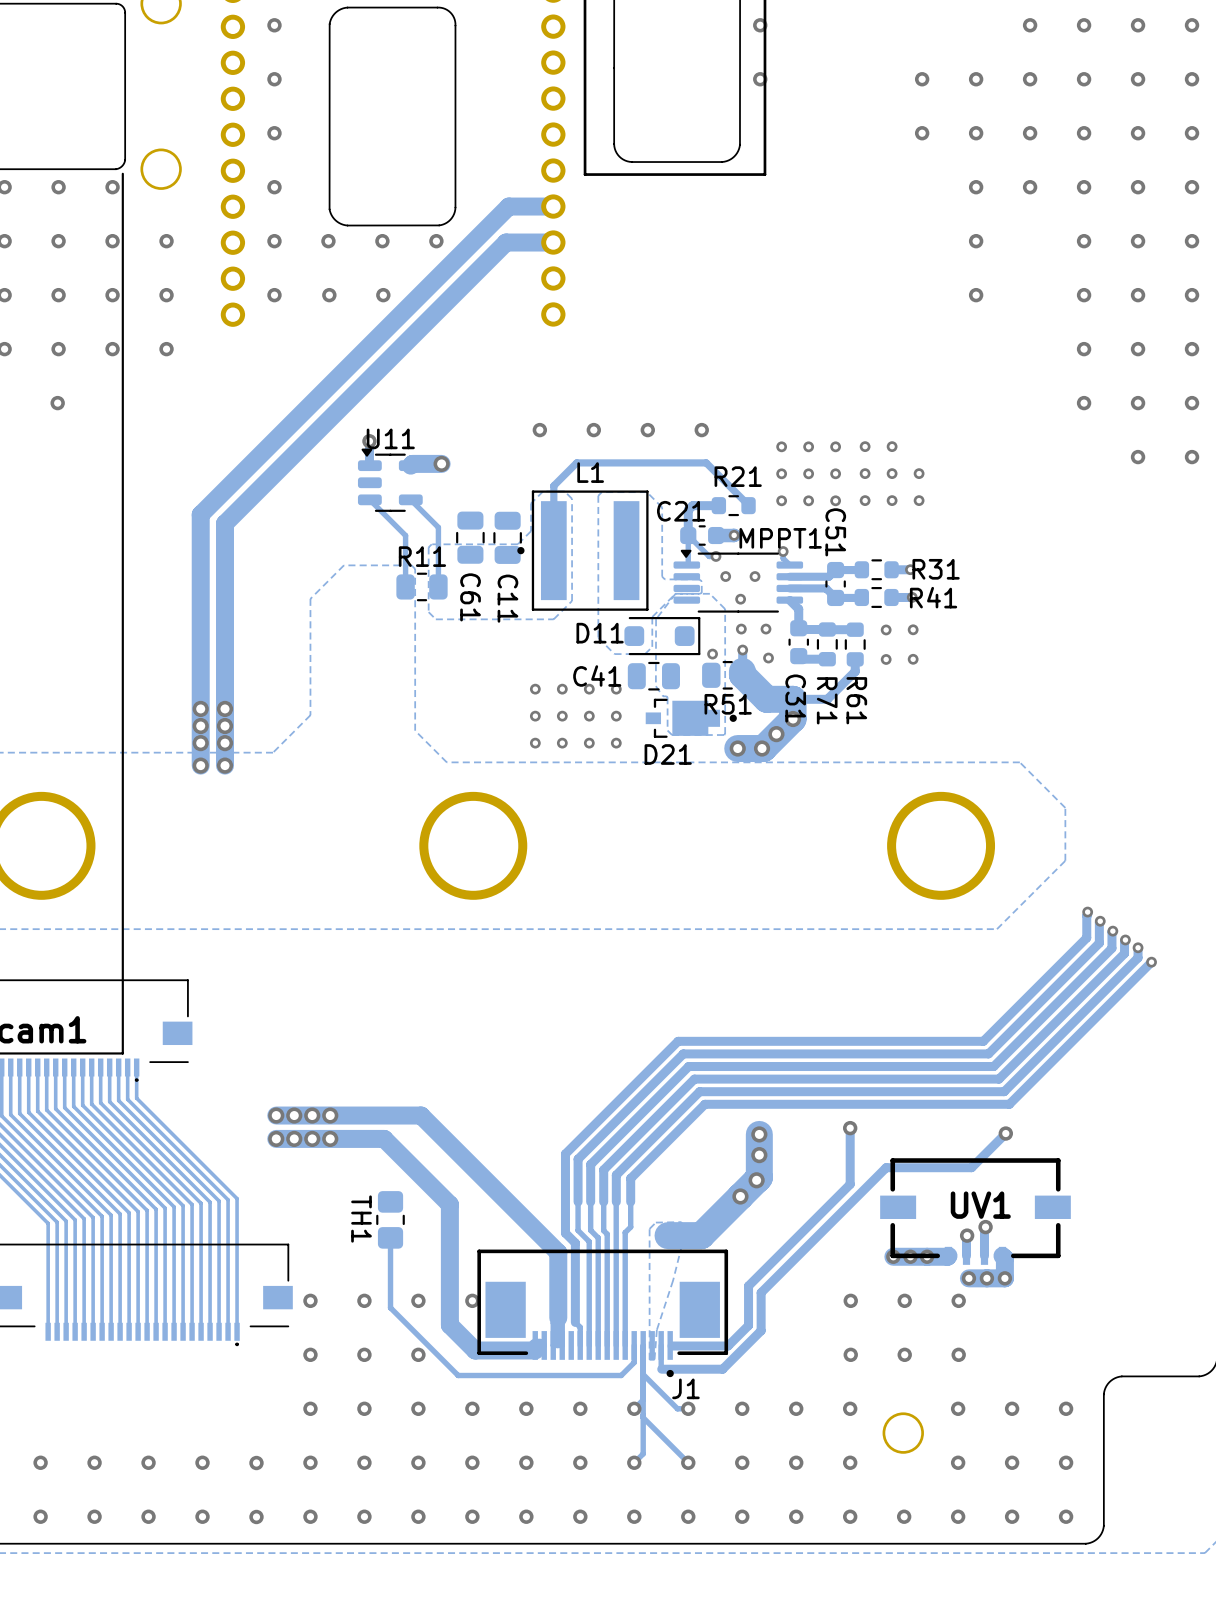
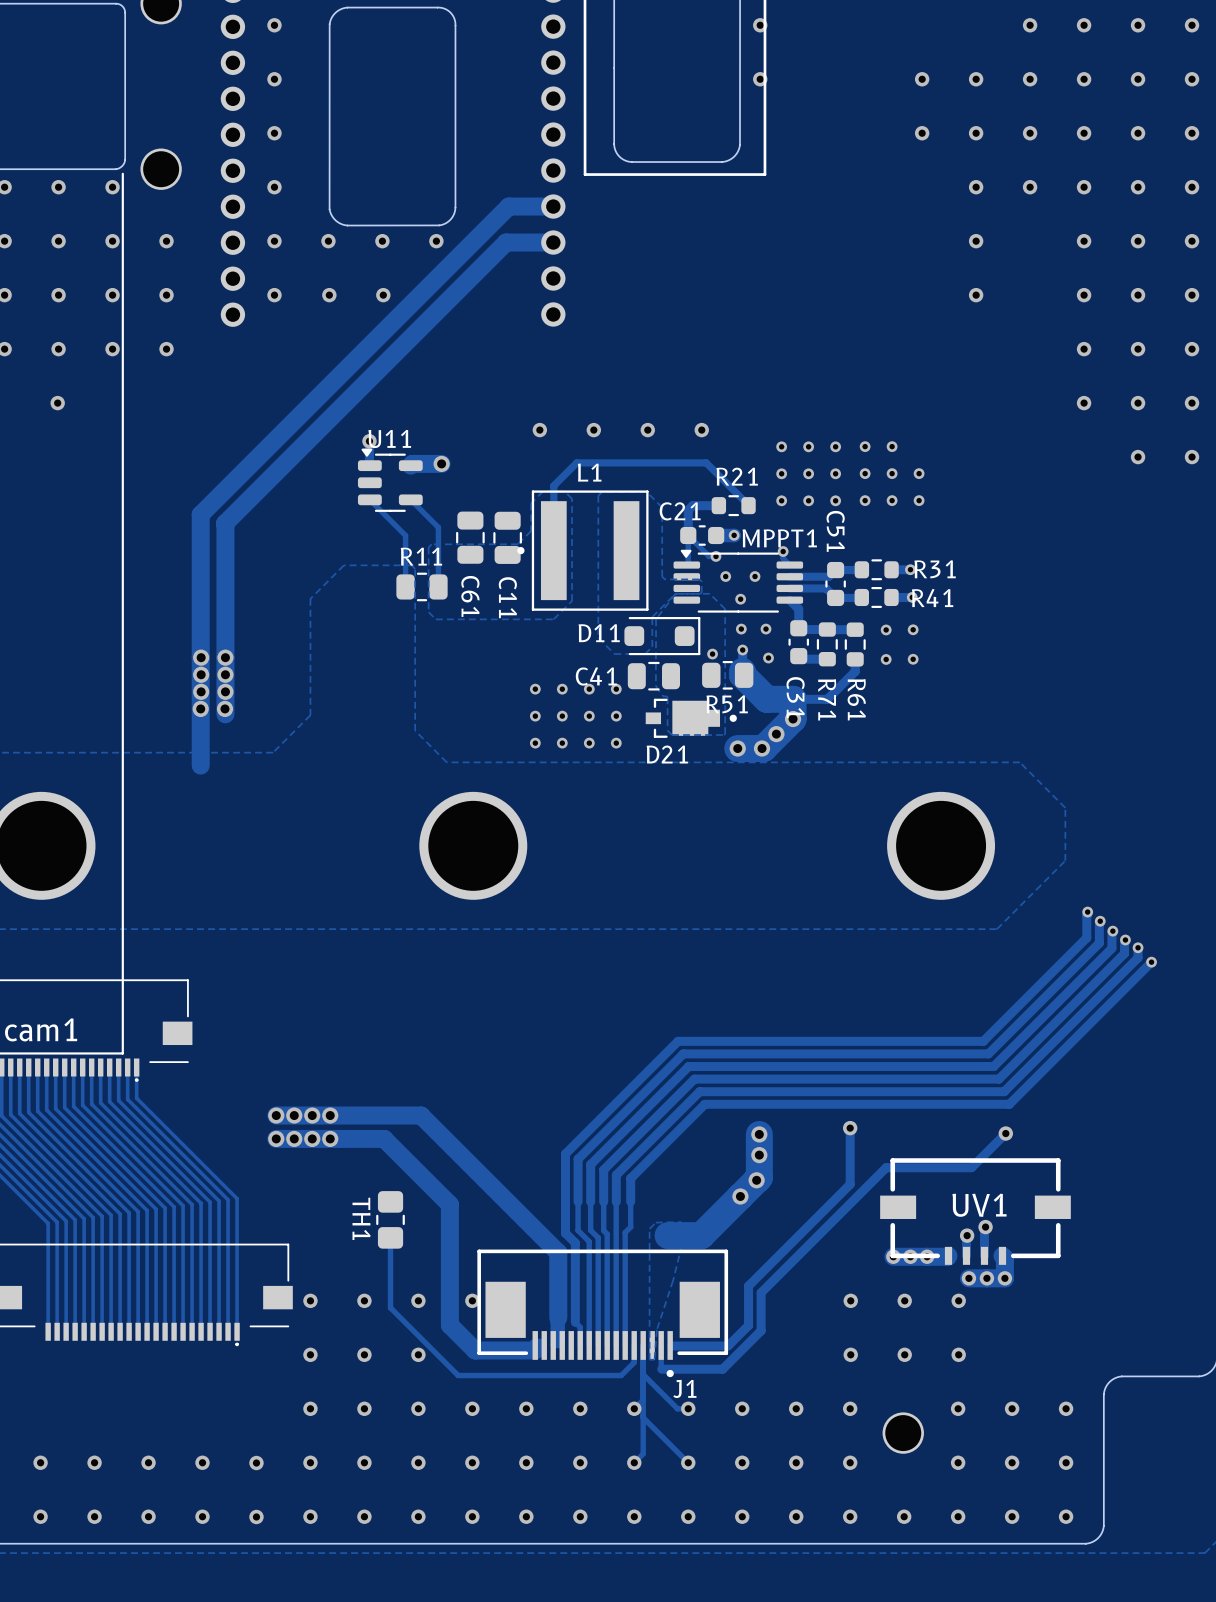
track: (225, 523) (225, 765) -> (225, 523) (225, 714)
via: none -> (201, 657)
via: none -> (225, 657)
via: none -> (201, 674)
via: none -> (225, 674)
via: none -> (201, 691)
via: none -> (225, 691)
via: (200, 726) -> none
via: (225, 726) -> none
via: (200, 743) -> none
via: (225, 743) -> none
via: (200, 765) -> none
via: (225, 765) -> none

